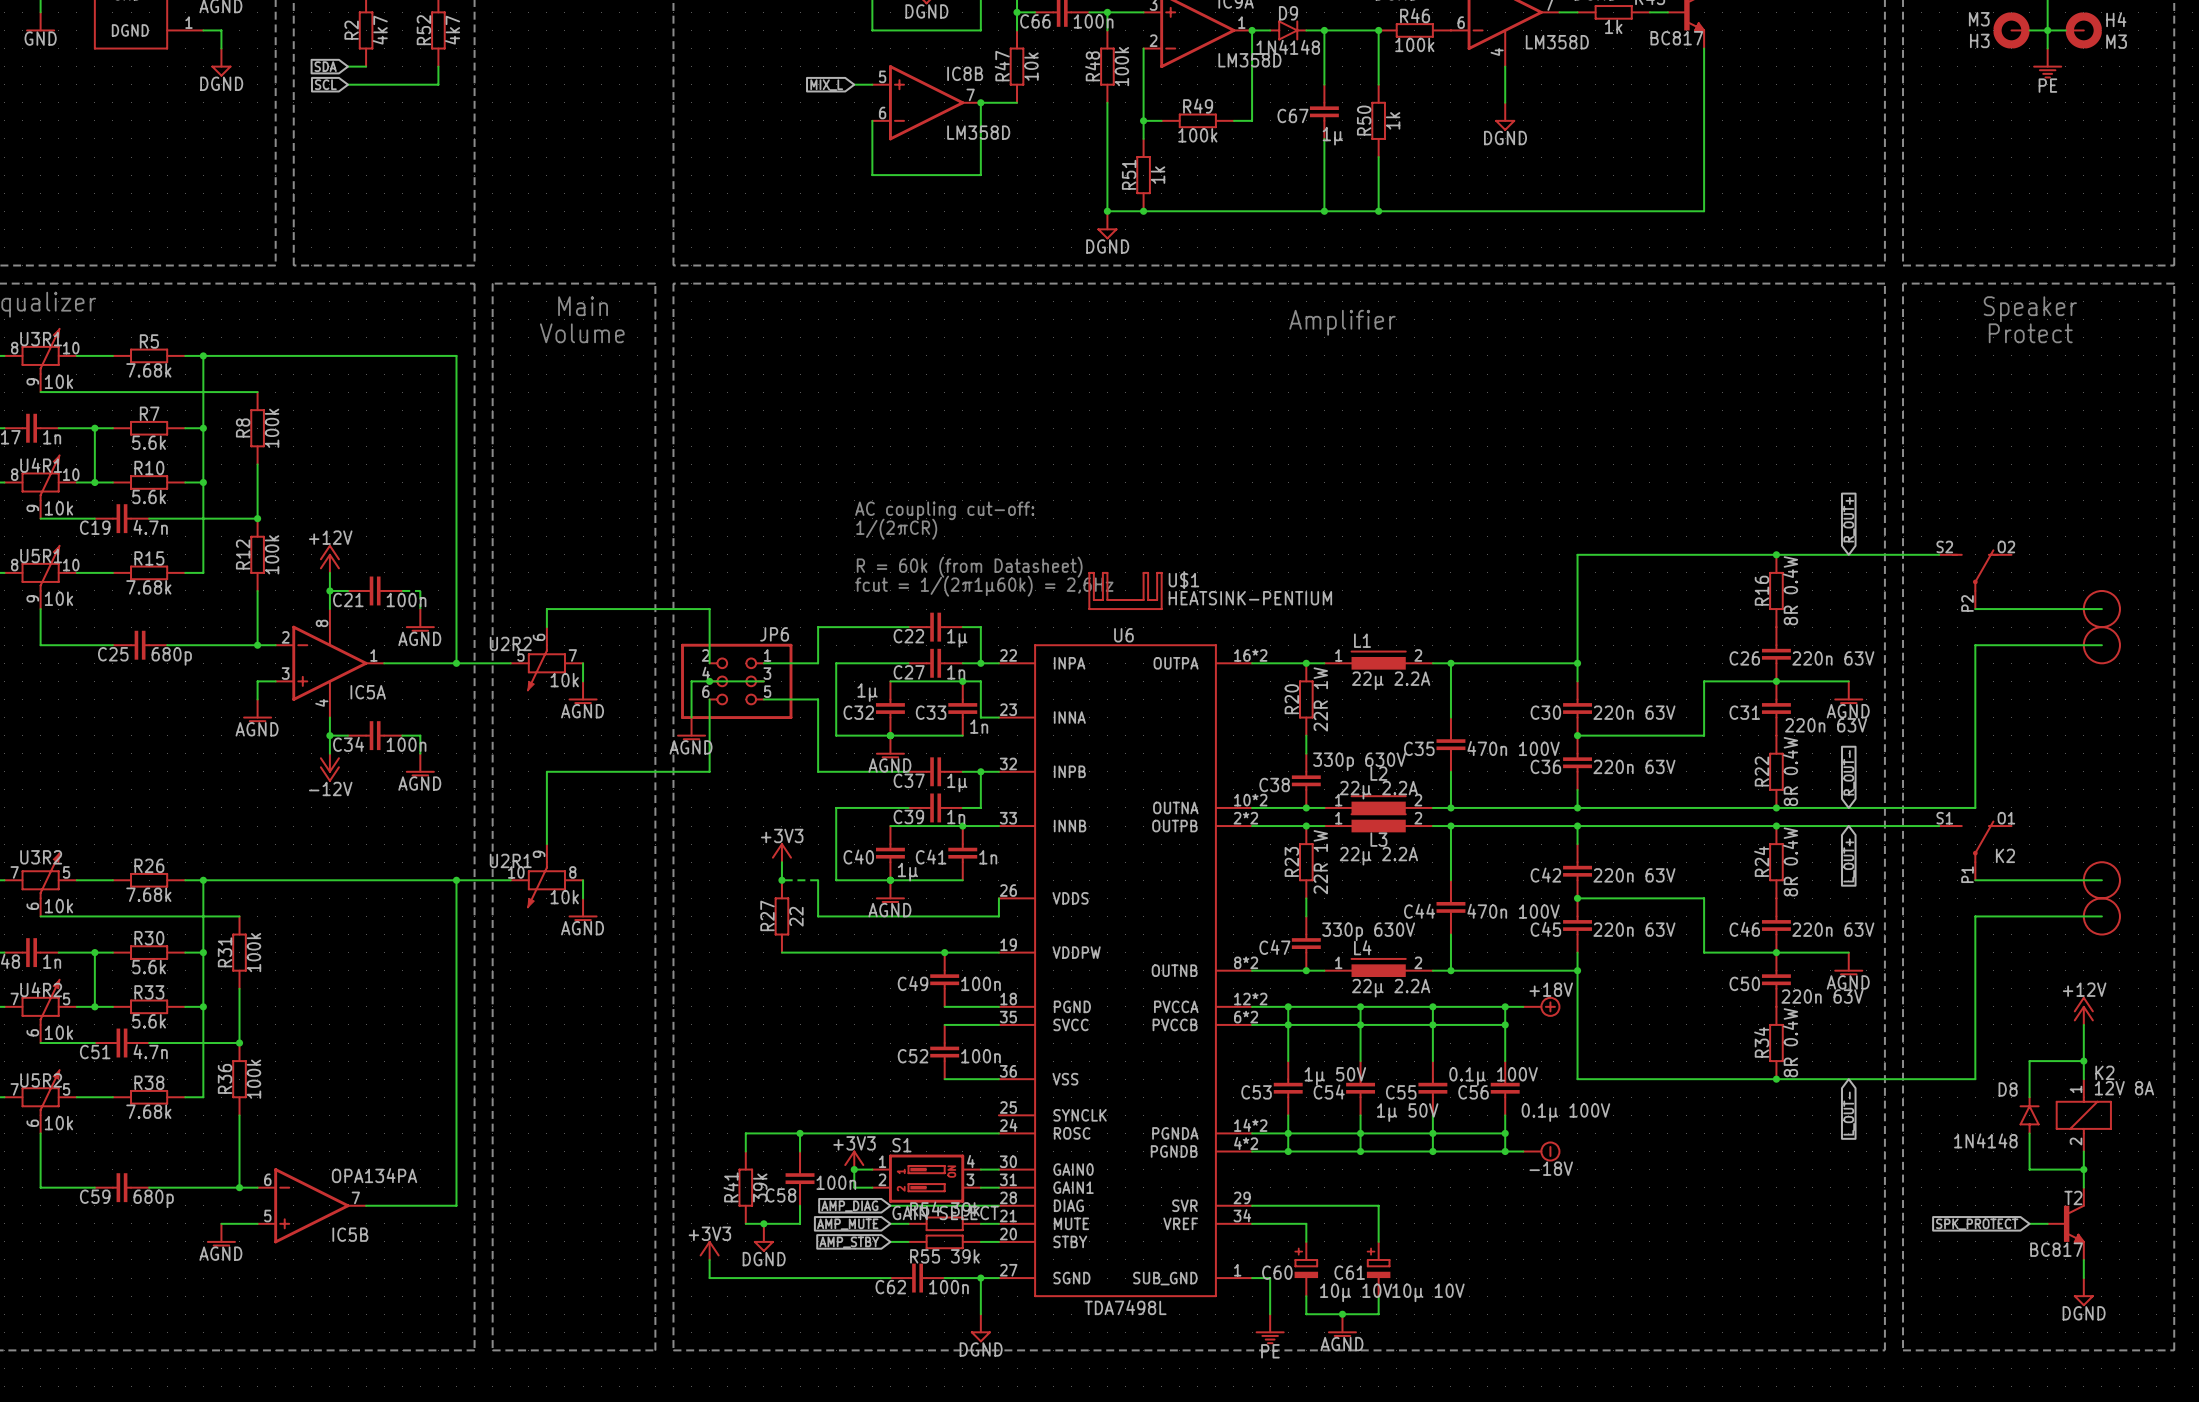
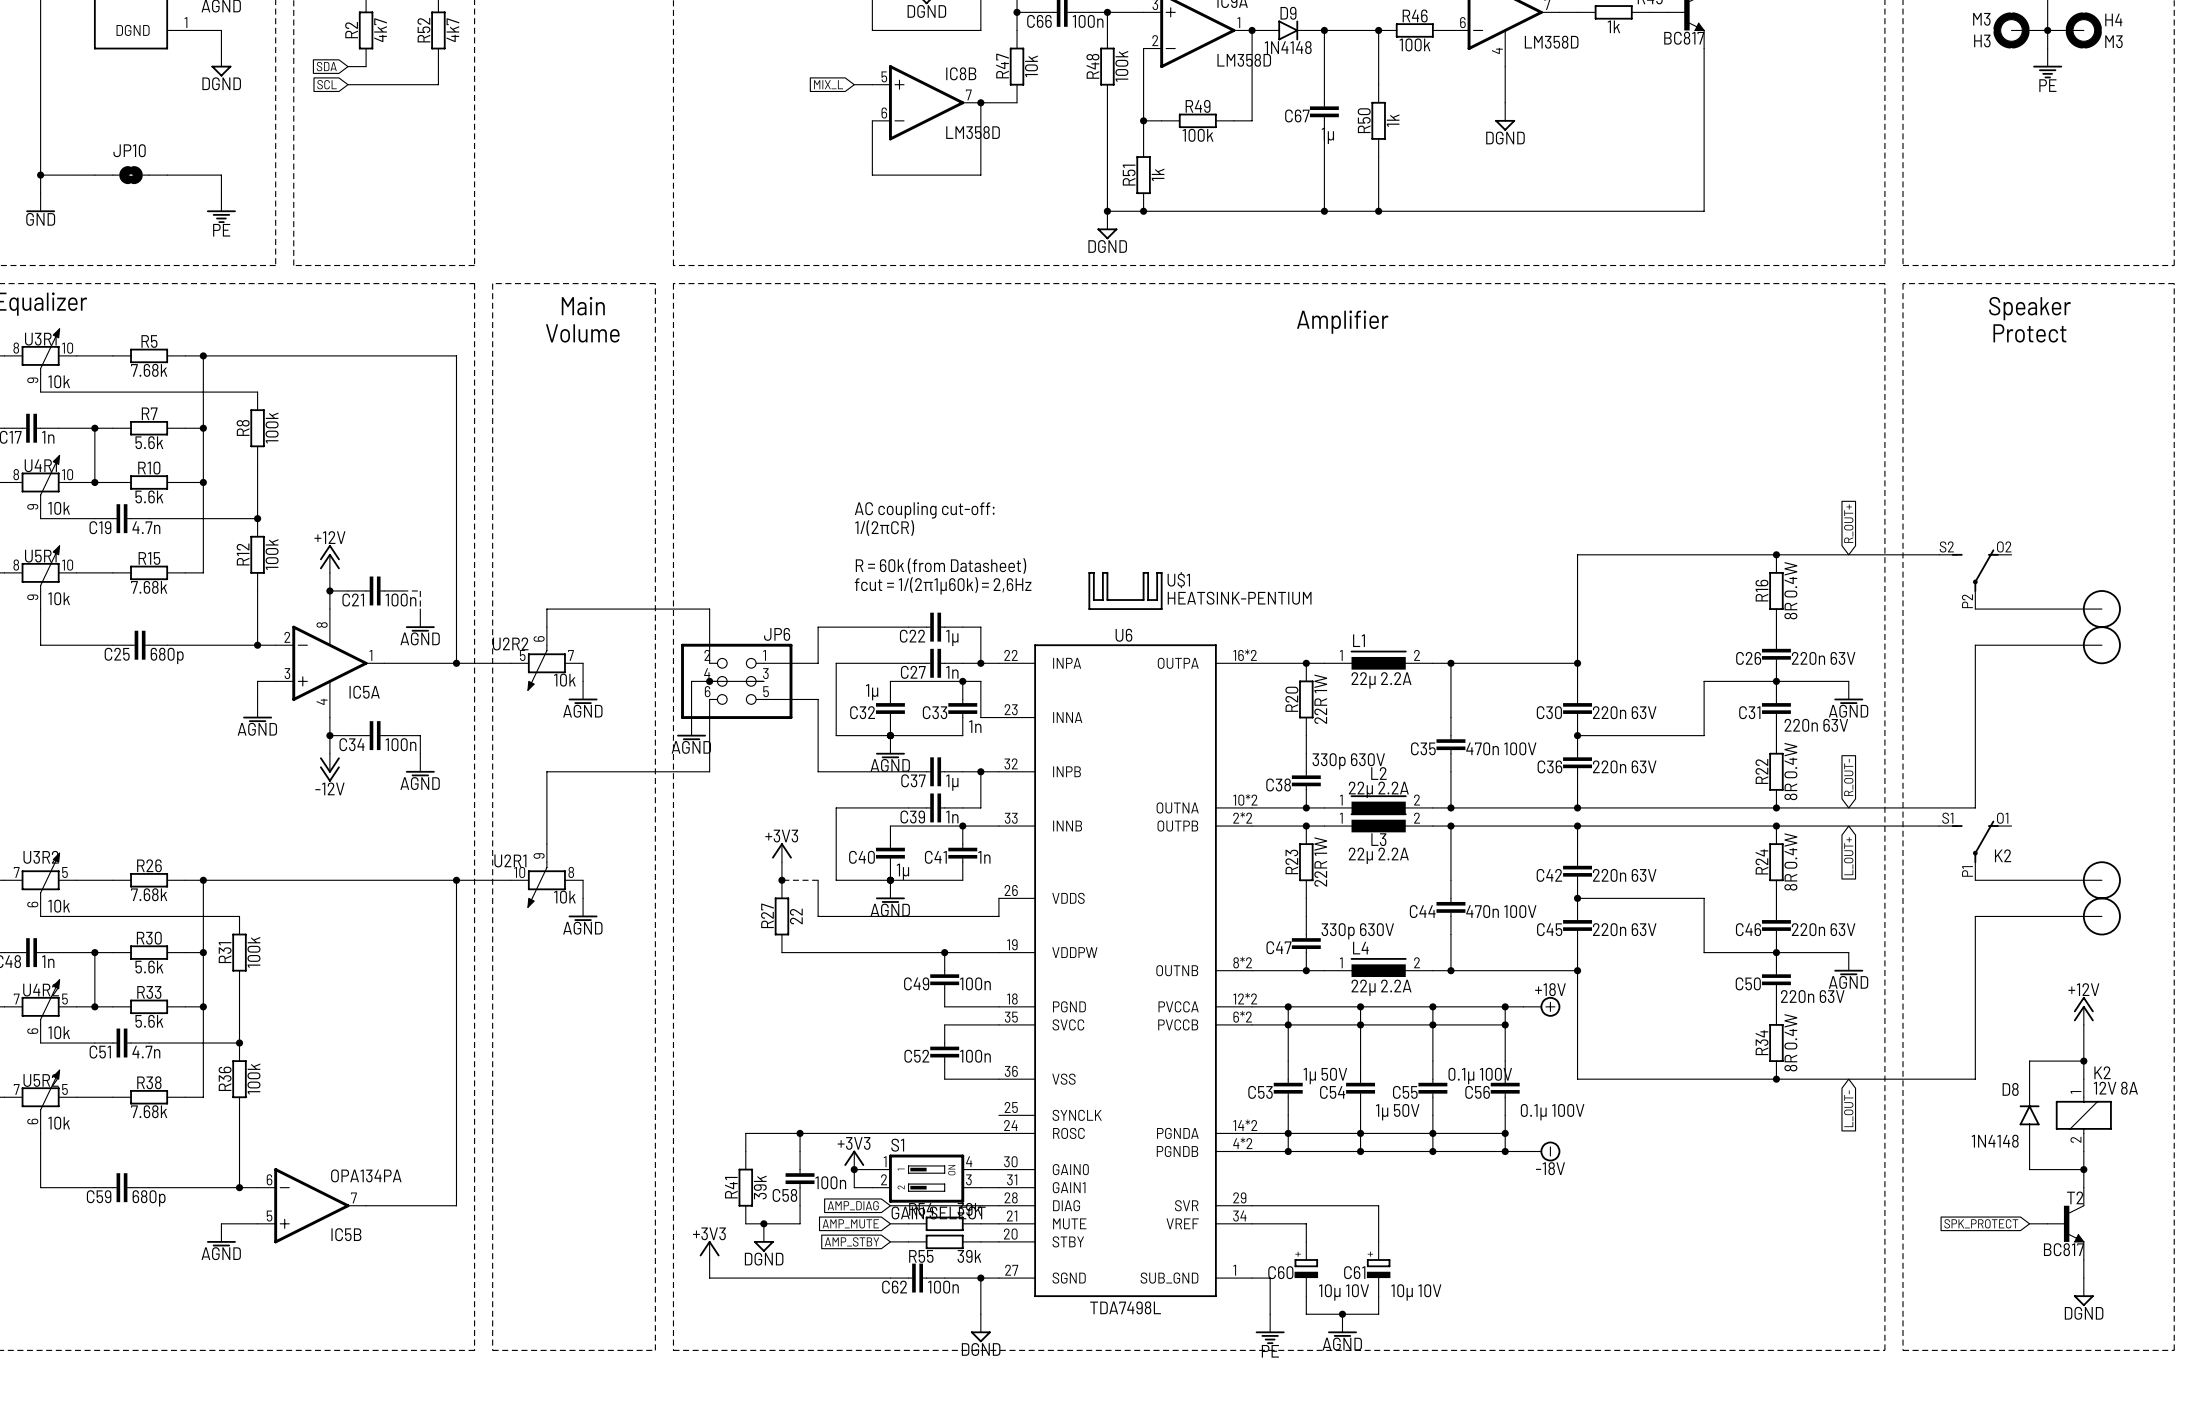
wire: none -> (40, 12) (40, 193)
power symbol: GND (40, 21) -> none
wire: none -> (40, 175) (94, 175)
junction: none -> (40, 175)
JP10: none -> (131, 175)
wire: none -> (167, 175) (221, 175) (221, 193)
power symbol: none -> GND (40, 202)
power symbol: none -> PE (221, 208)

